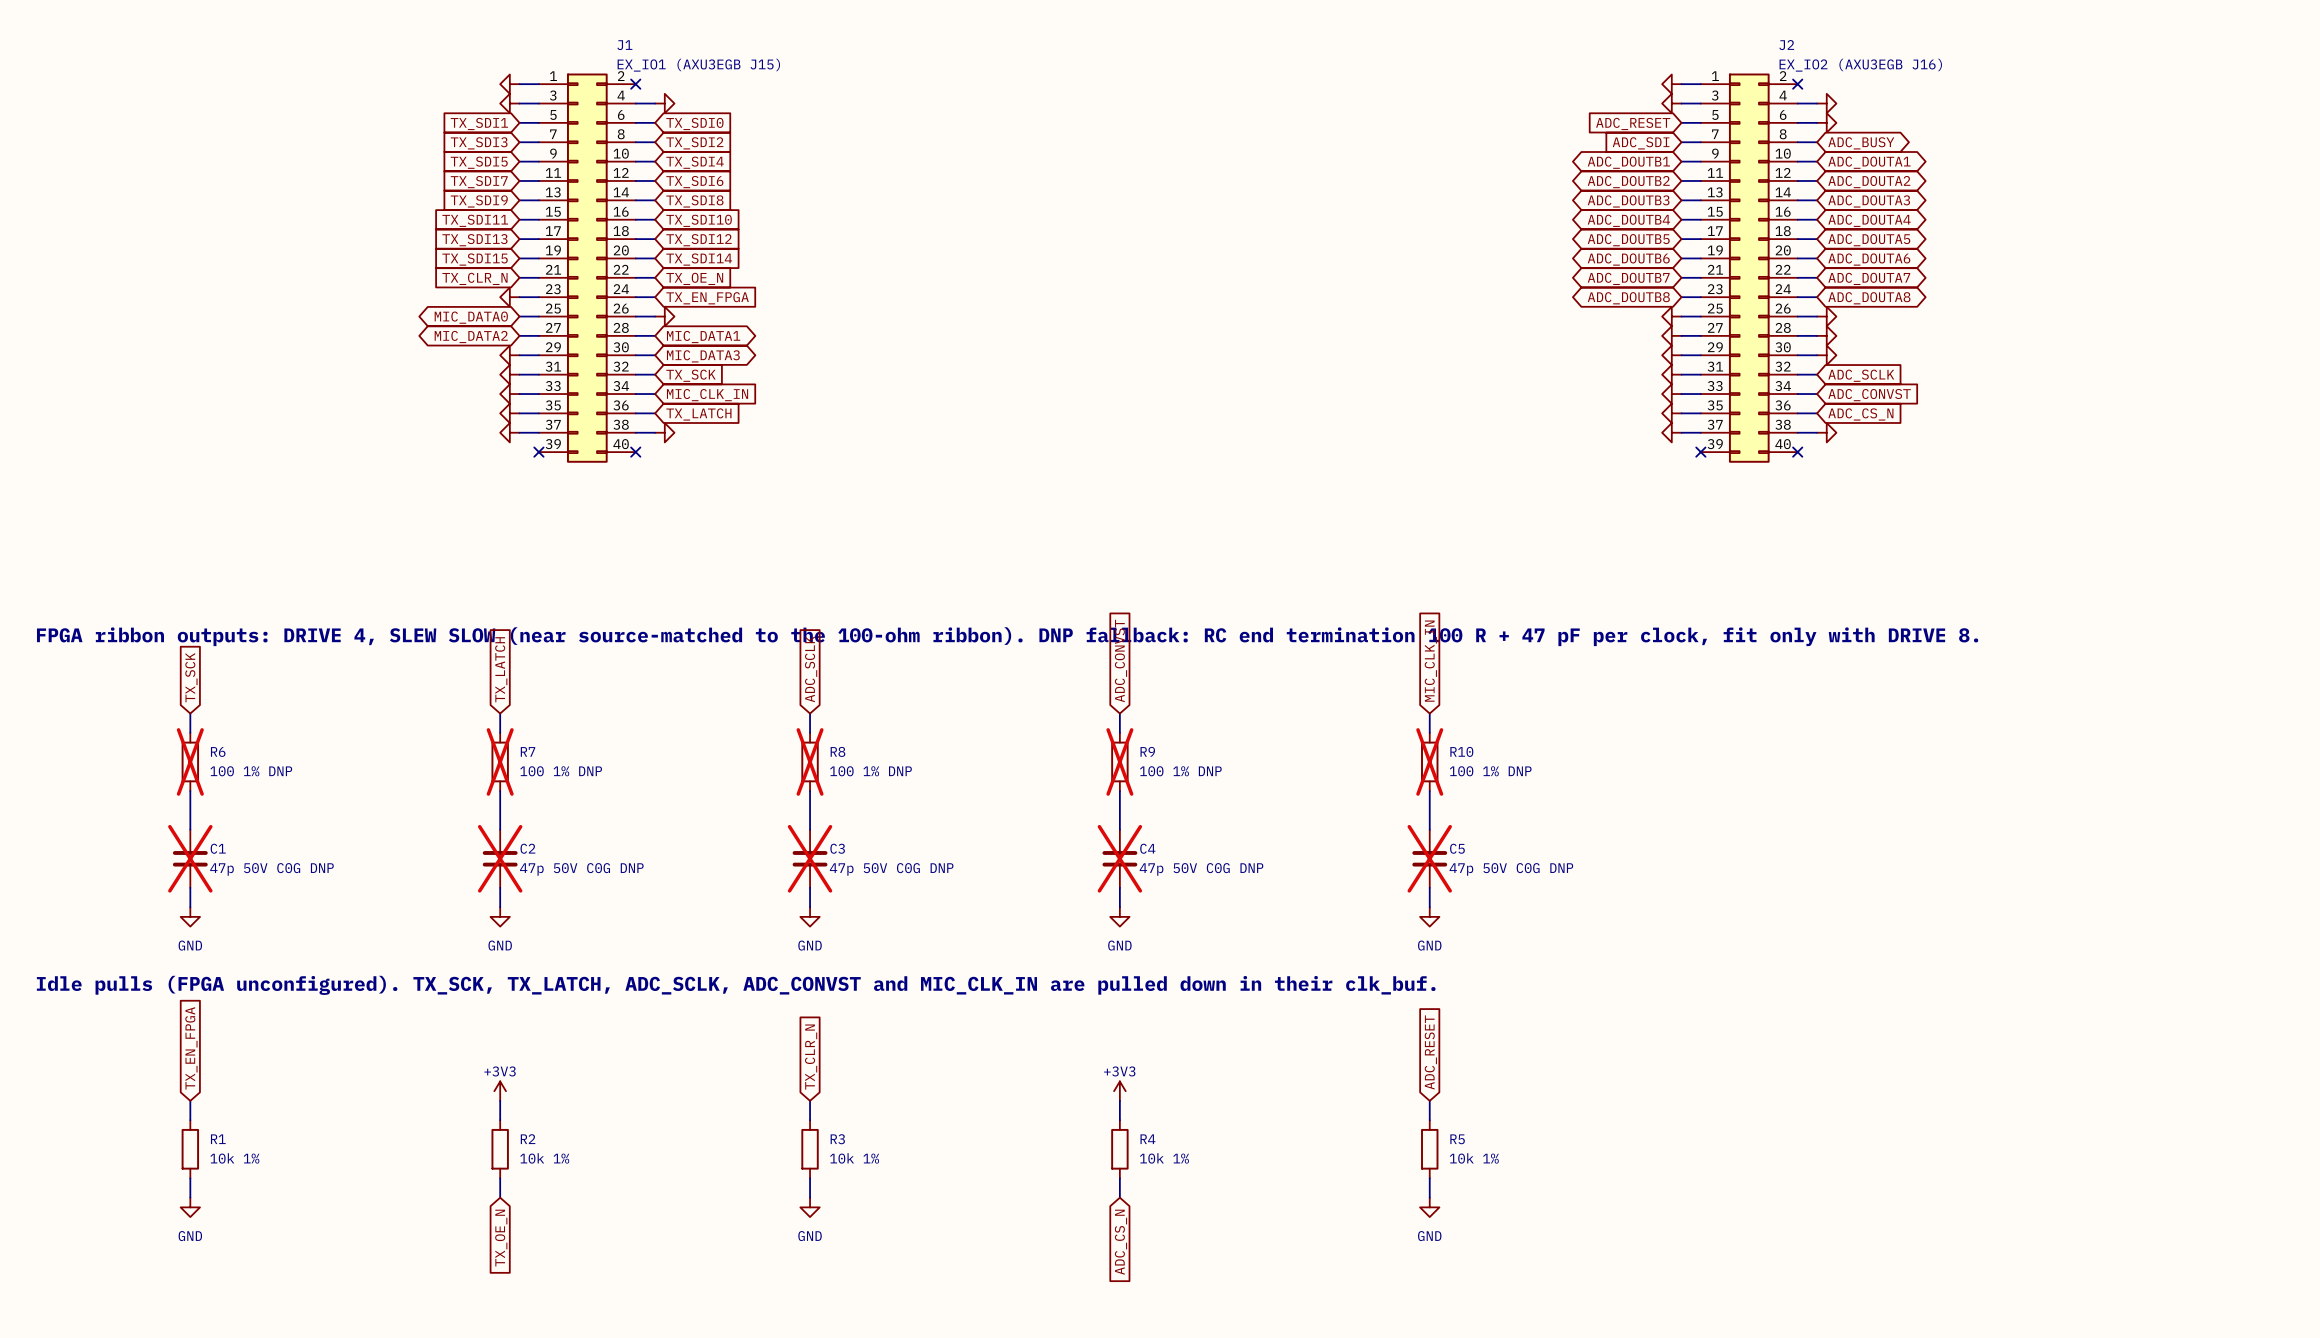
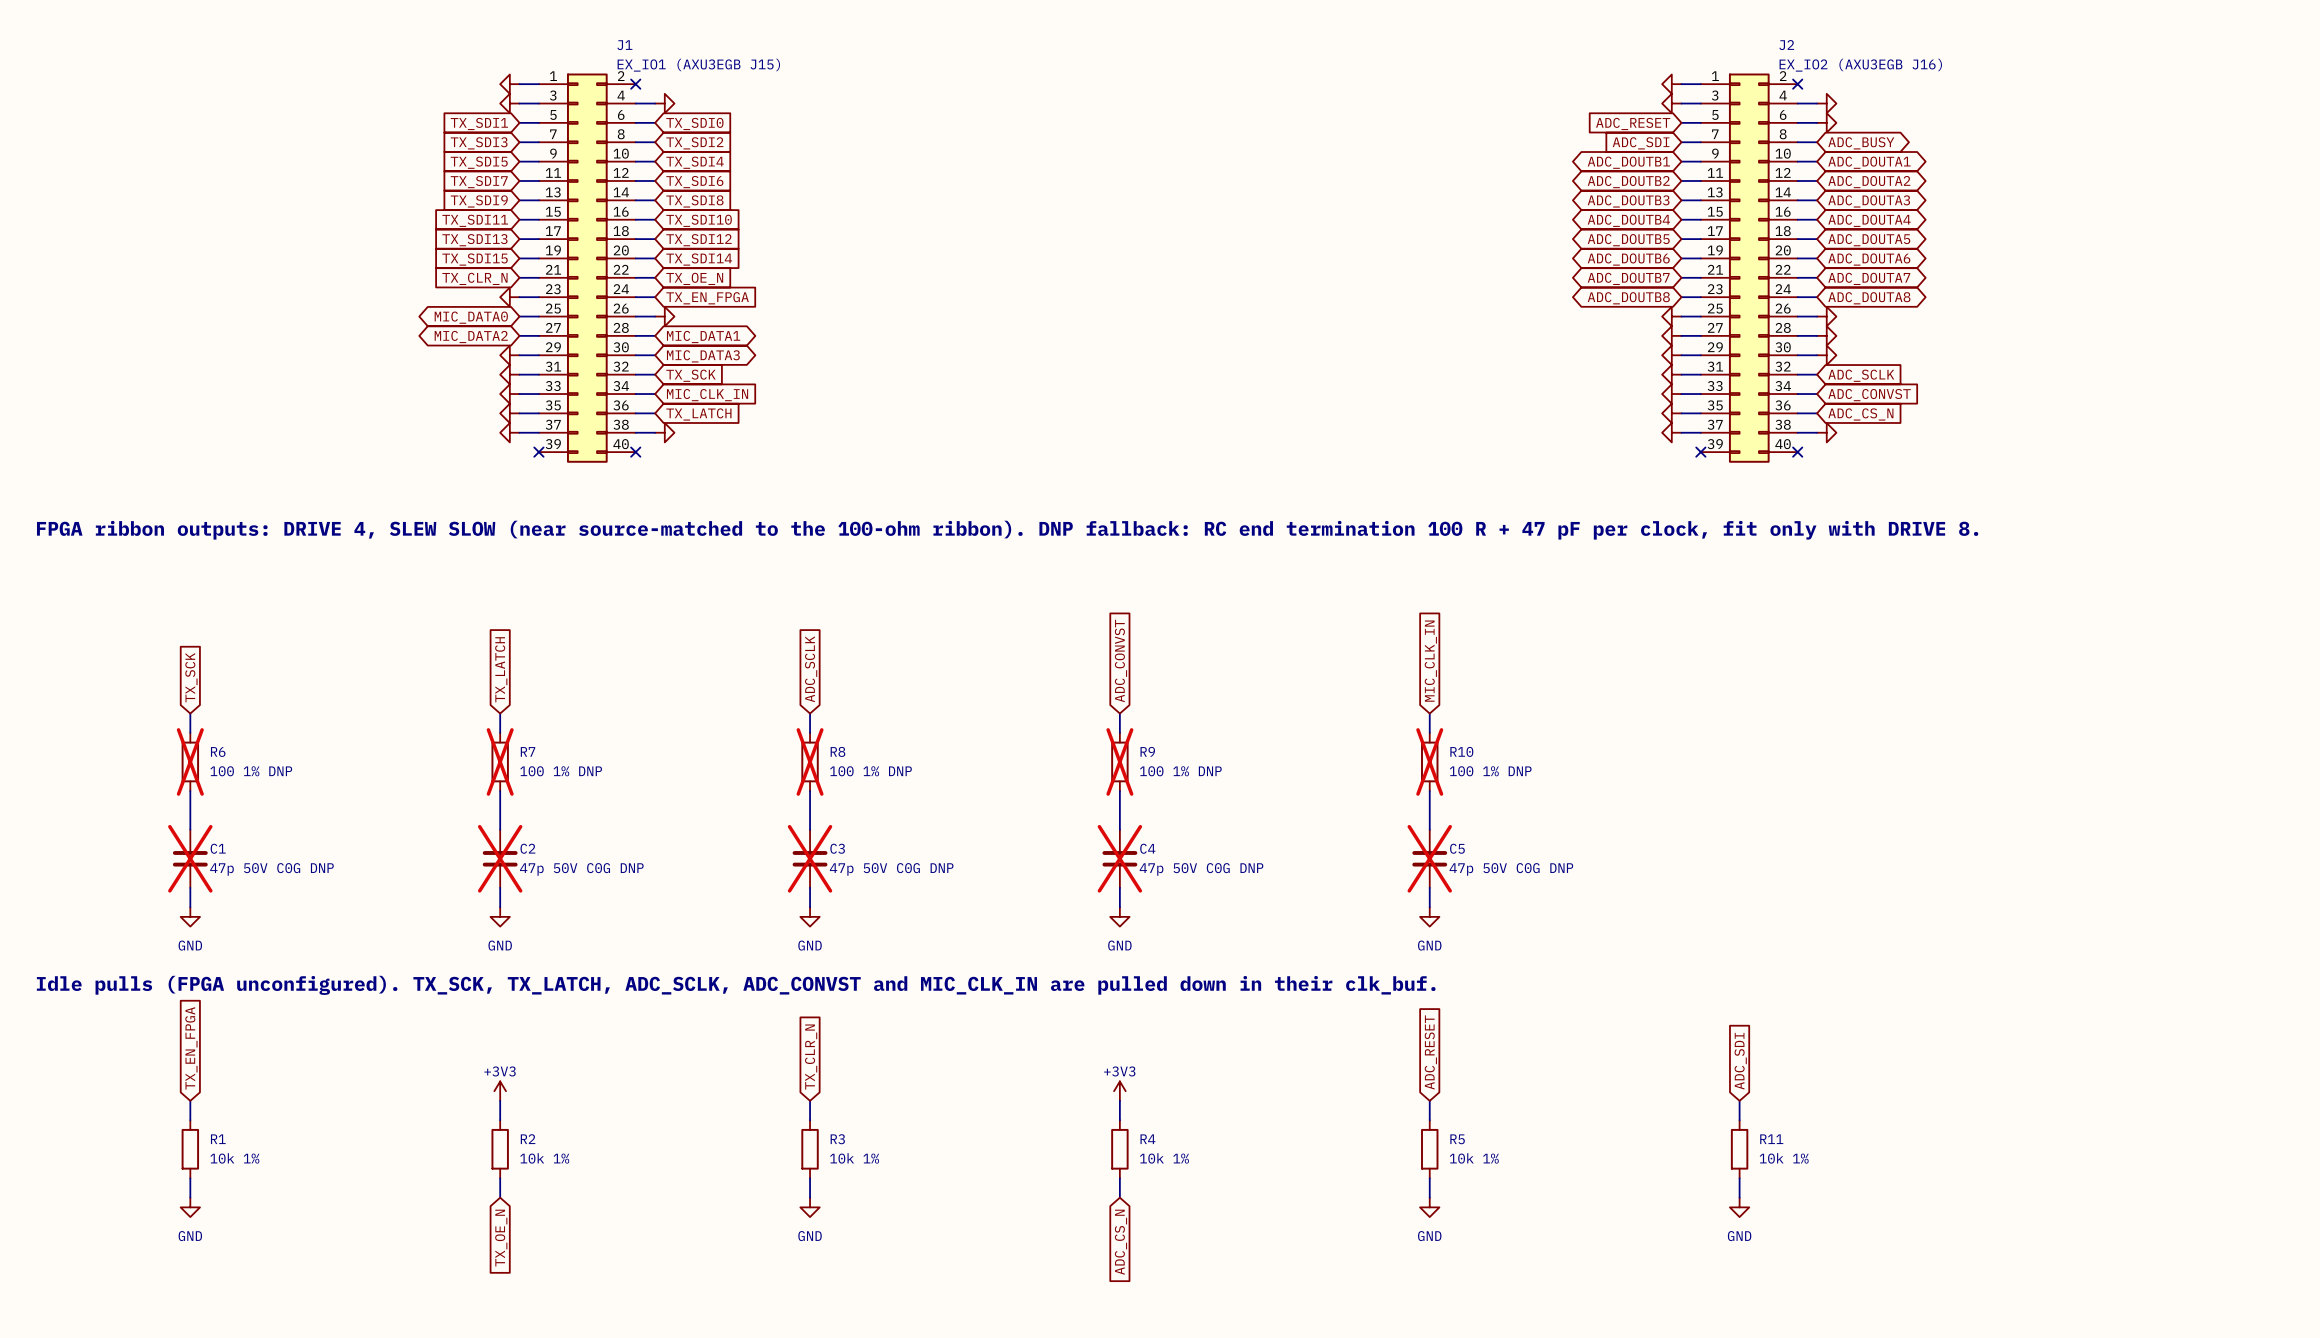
text position: FPGA ribbon outputs: DRIVE 4, SLEW SLOW (near source-matched to the 100-ohm ribbon). DNP fallback: RC end termination 100 R + 47 pF per clock, fit only with DRIVE 8. (1007, 636) -> FPGA ribbon outputs: DRIVE 4, SLEW SLOW (near source-matched to the 100-ohm ribbon). DNP fallback: RC end termination 100 R + 47 pF per clock, fit only with DRIVE 8. (1007, 530)
global label: none -> ADC_SDI (1740, 1061)
wire: none -> (1739, 1100) (1739, 1120)
R11: none -> 10k 1% (1739, 1149)
wire: none -> (1739, 1178) (1739, 1197)
power symbol: none -> GND (1739, 1207)

